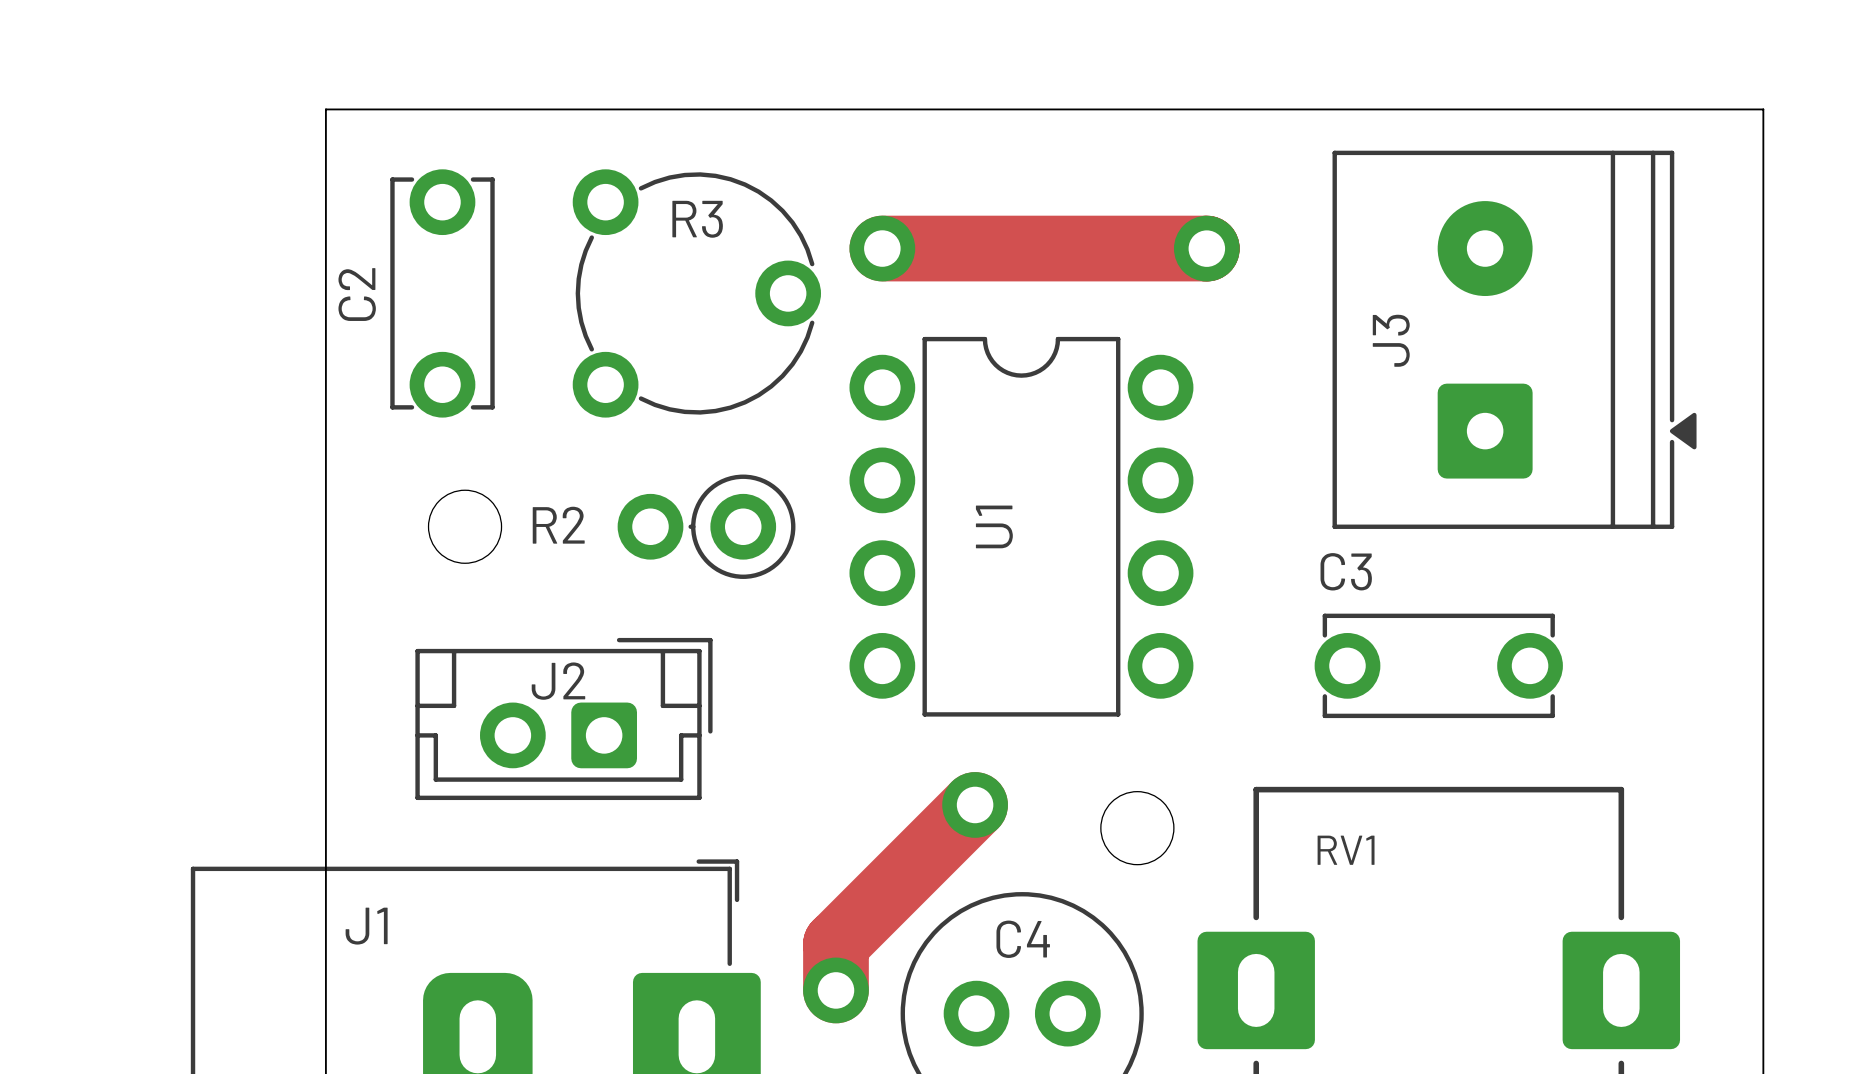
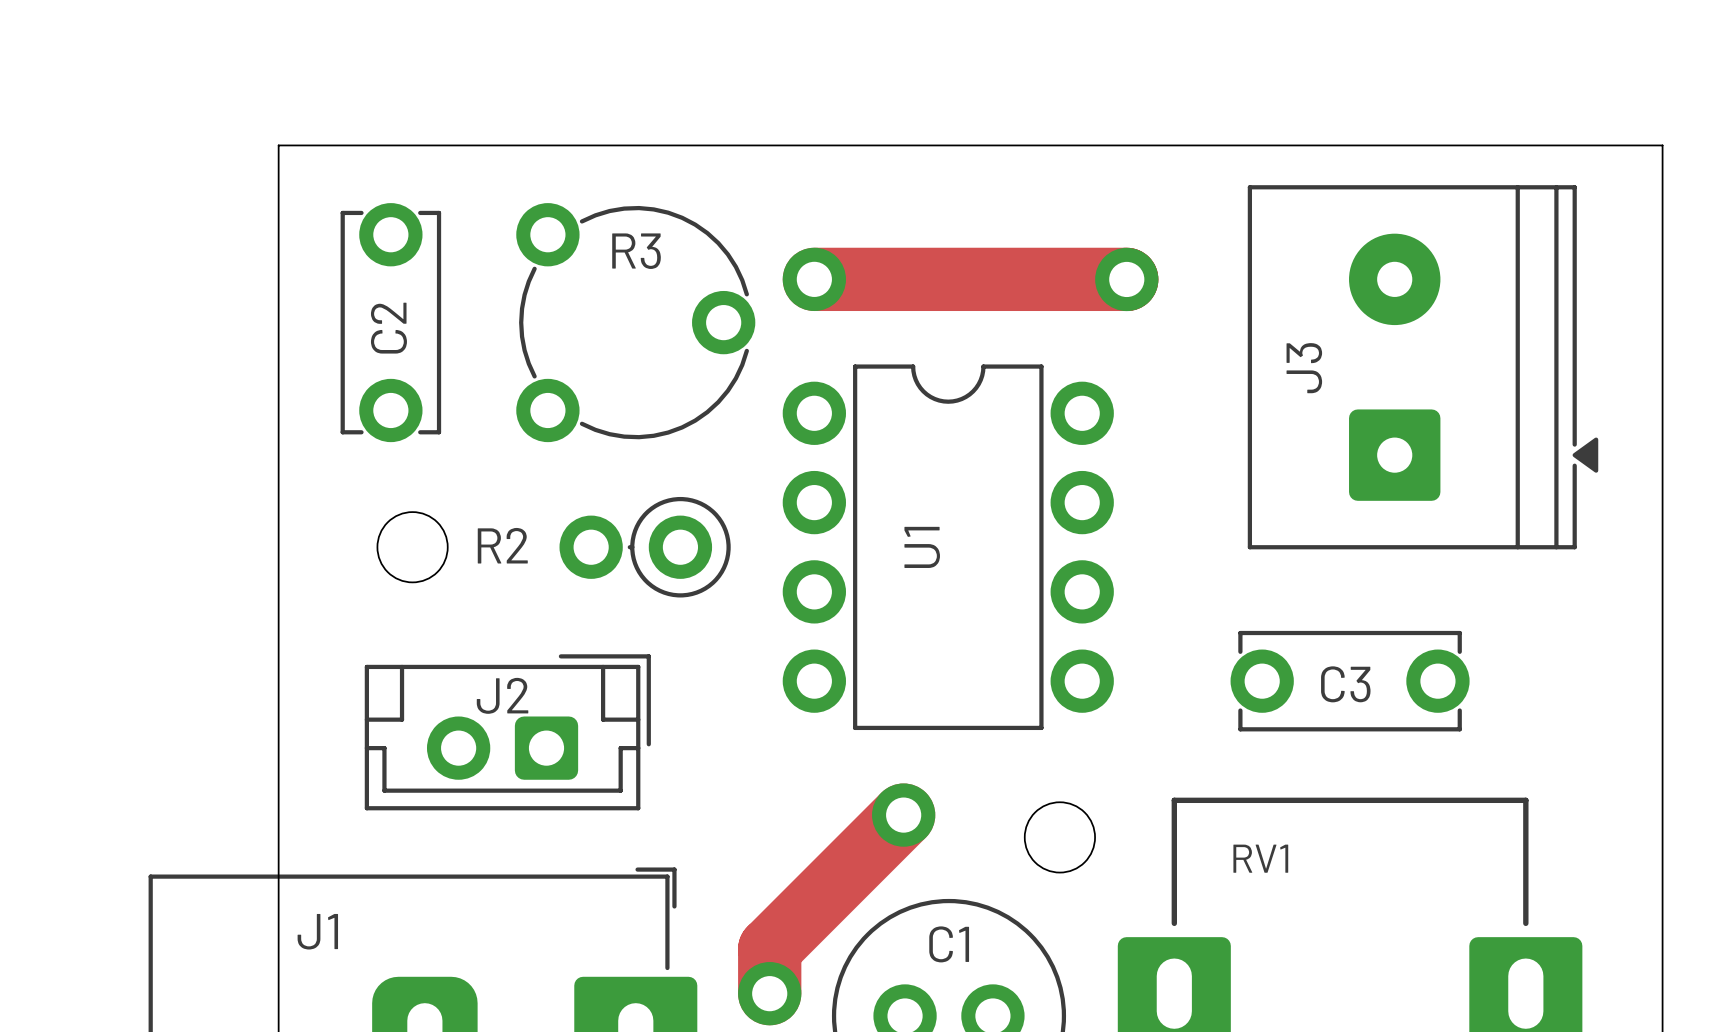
C2 name position: C2 (357, 294) -> C2 (388, 328)
C3 name position: C3 (1346, 571) -> C3 (1345, 684)
C4 name: C4 (1023, 939) -> C1 (949, 944)

